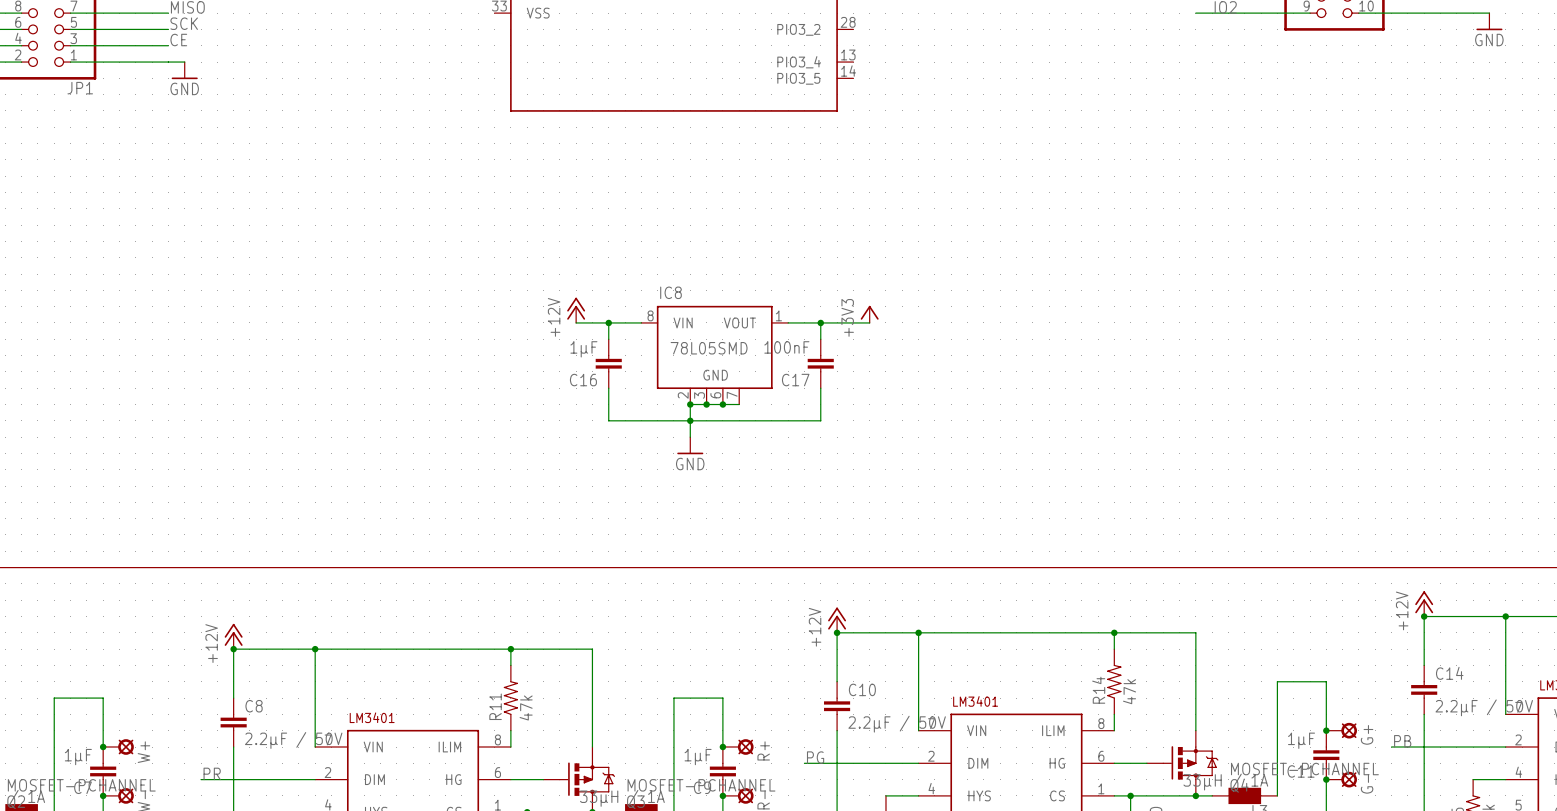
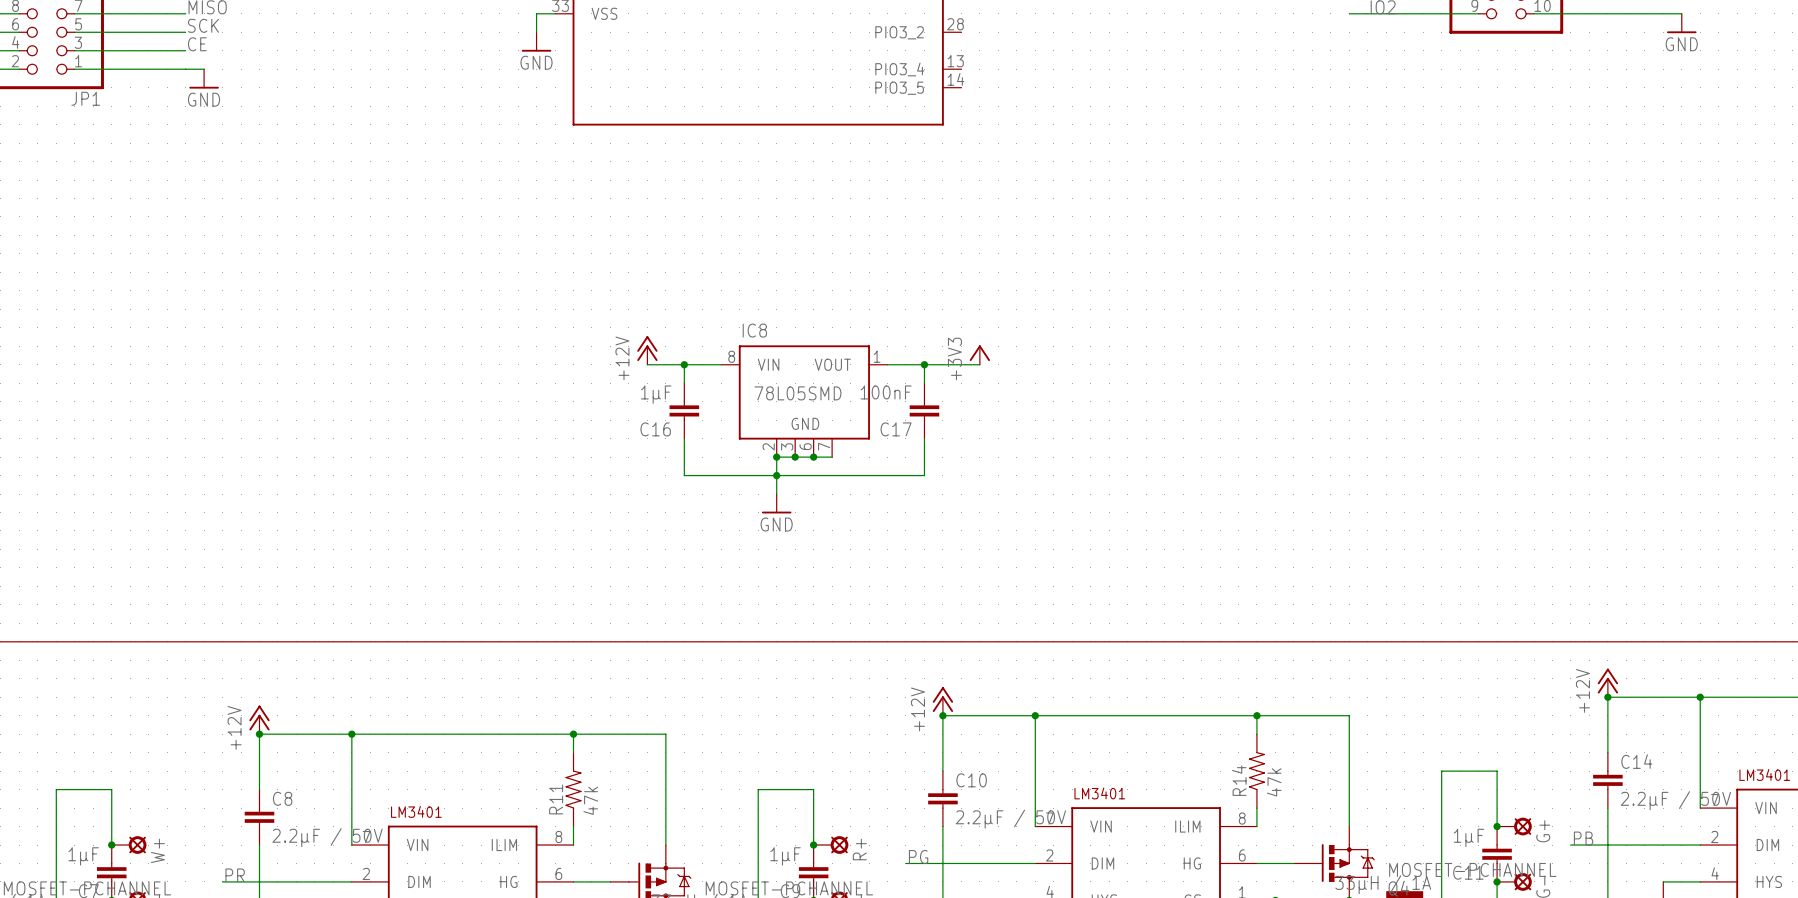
wire: none -> (555, 13) (536, 13) (536, 32)
power symbol: none -> GND (536, 41)

